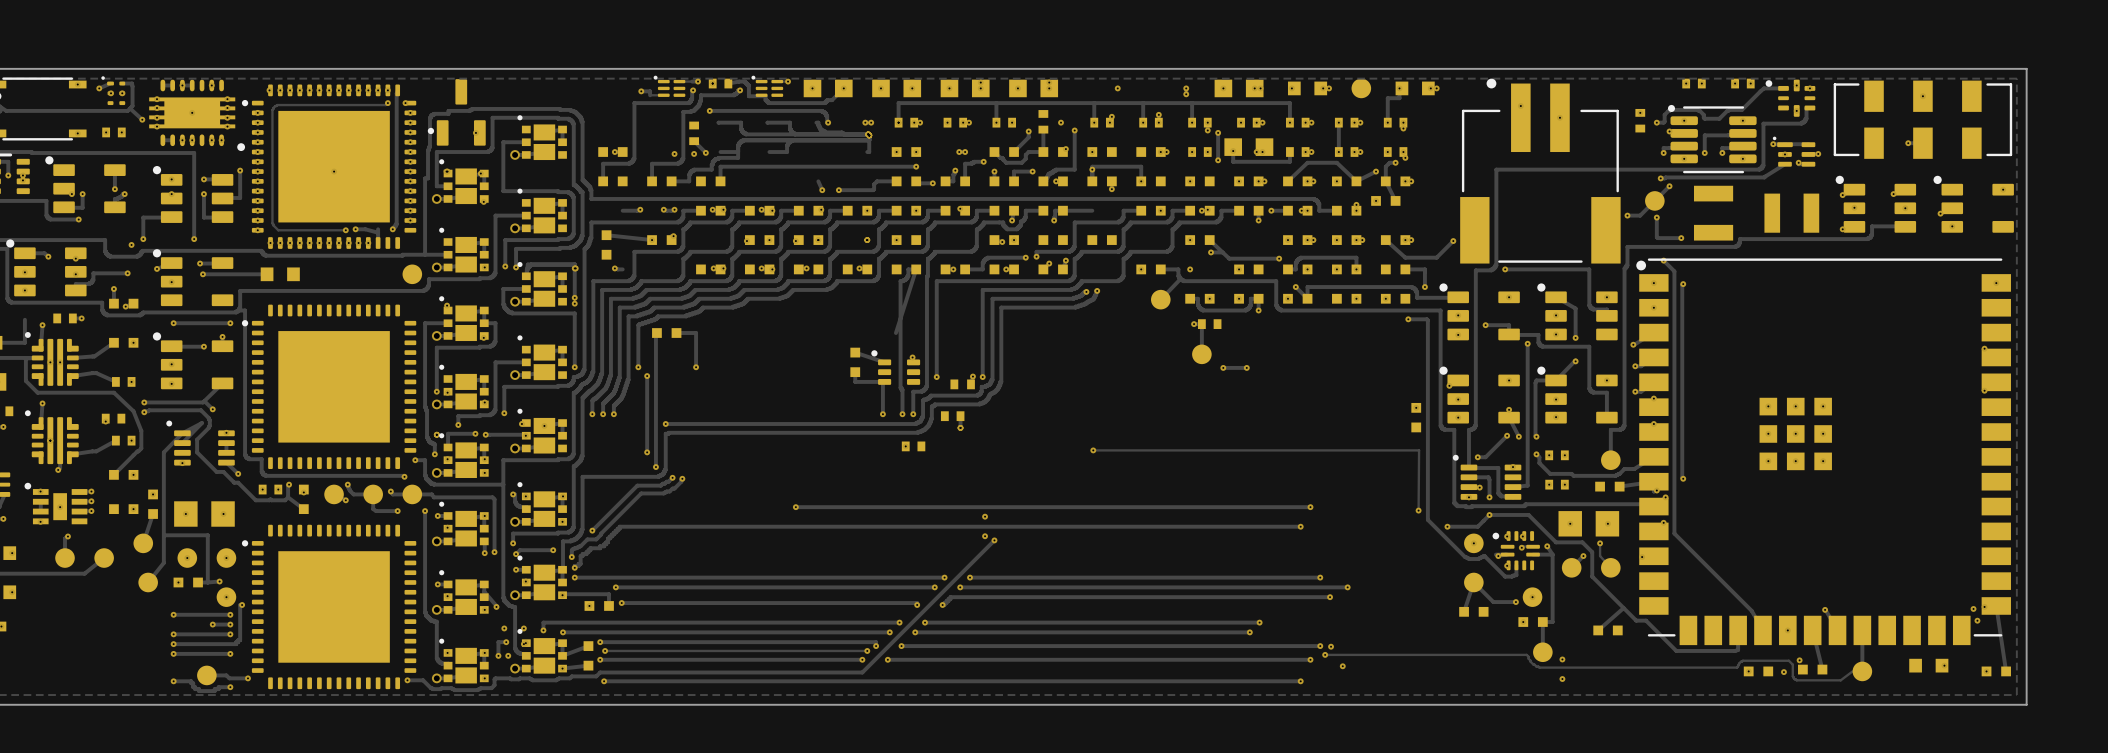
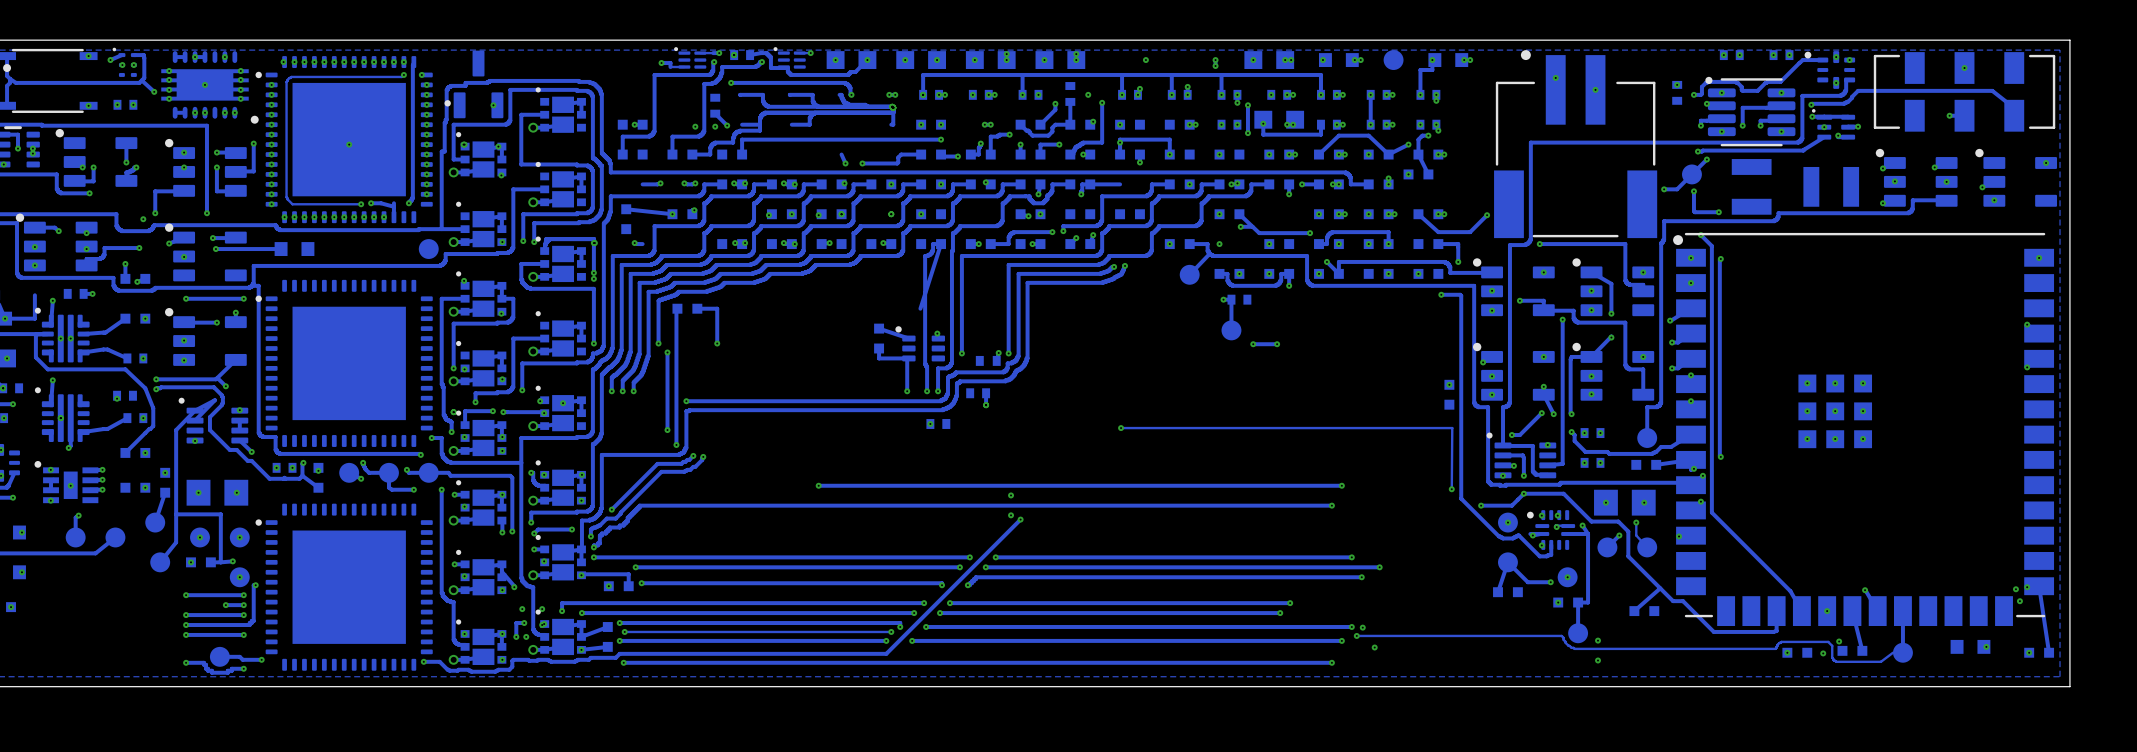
track: none -> (2006, 101) (1992, 90) (1858, 90) (1844, 103) (1811, 104)
via: none -> (1811, 104)

